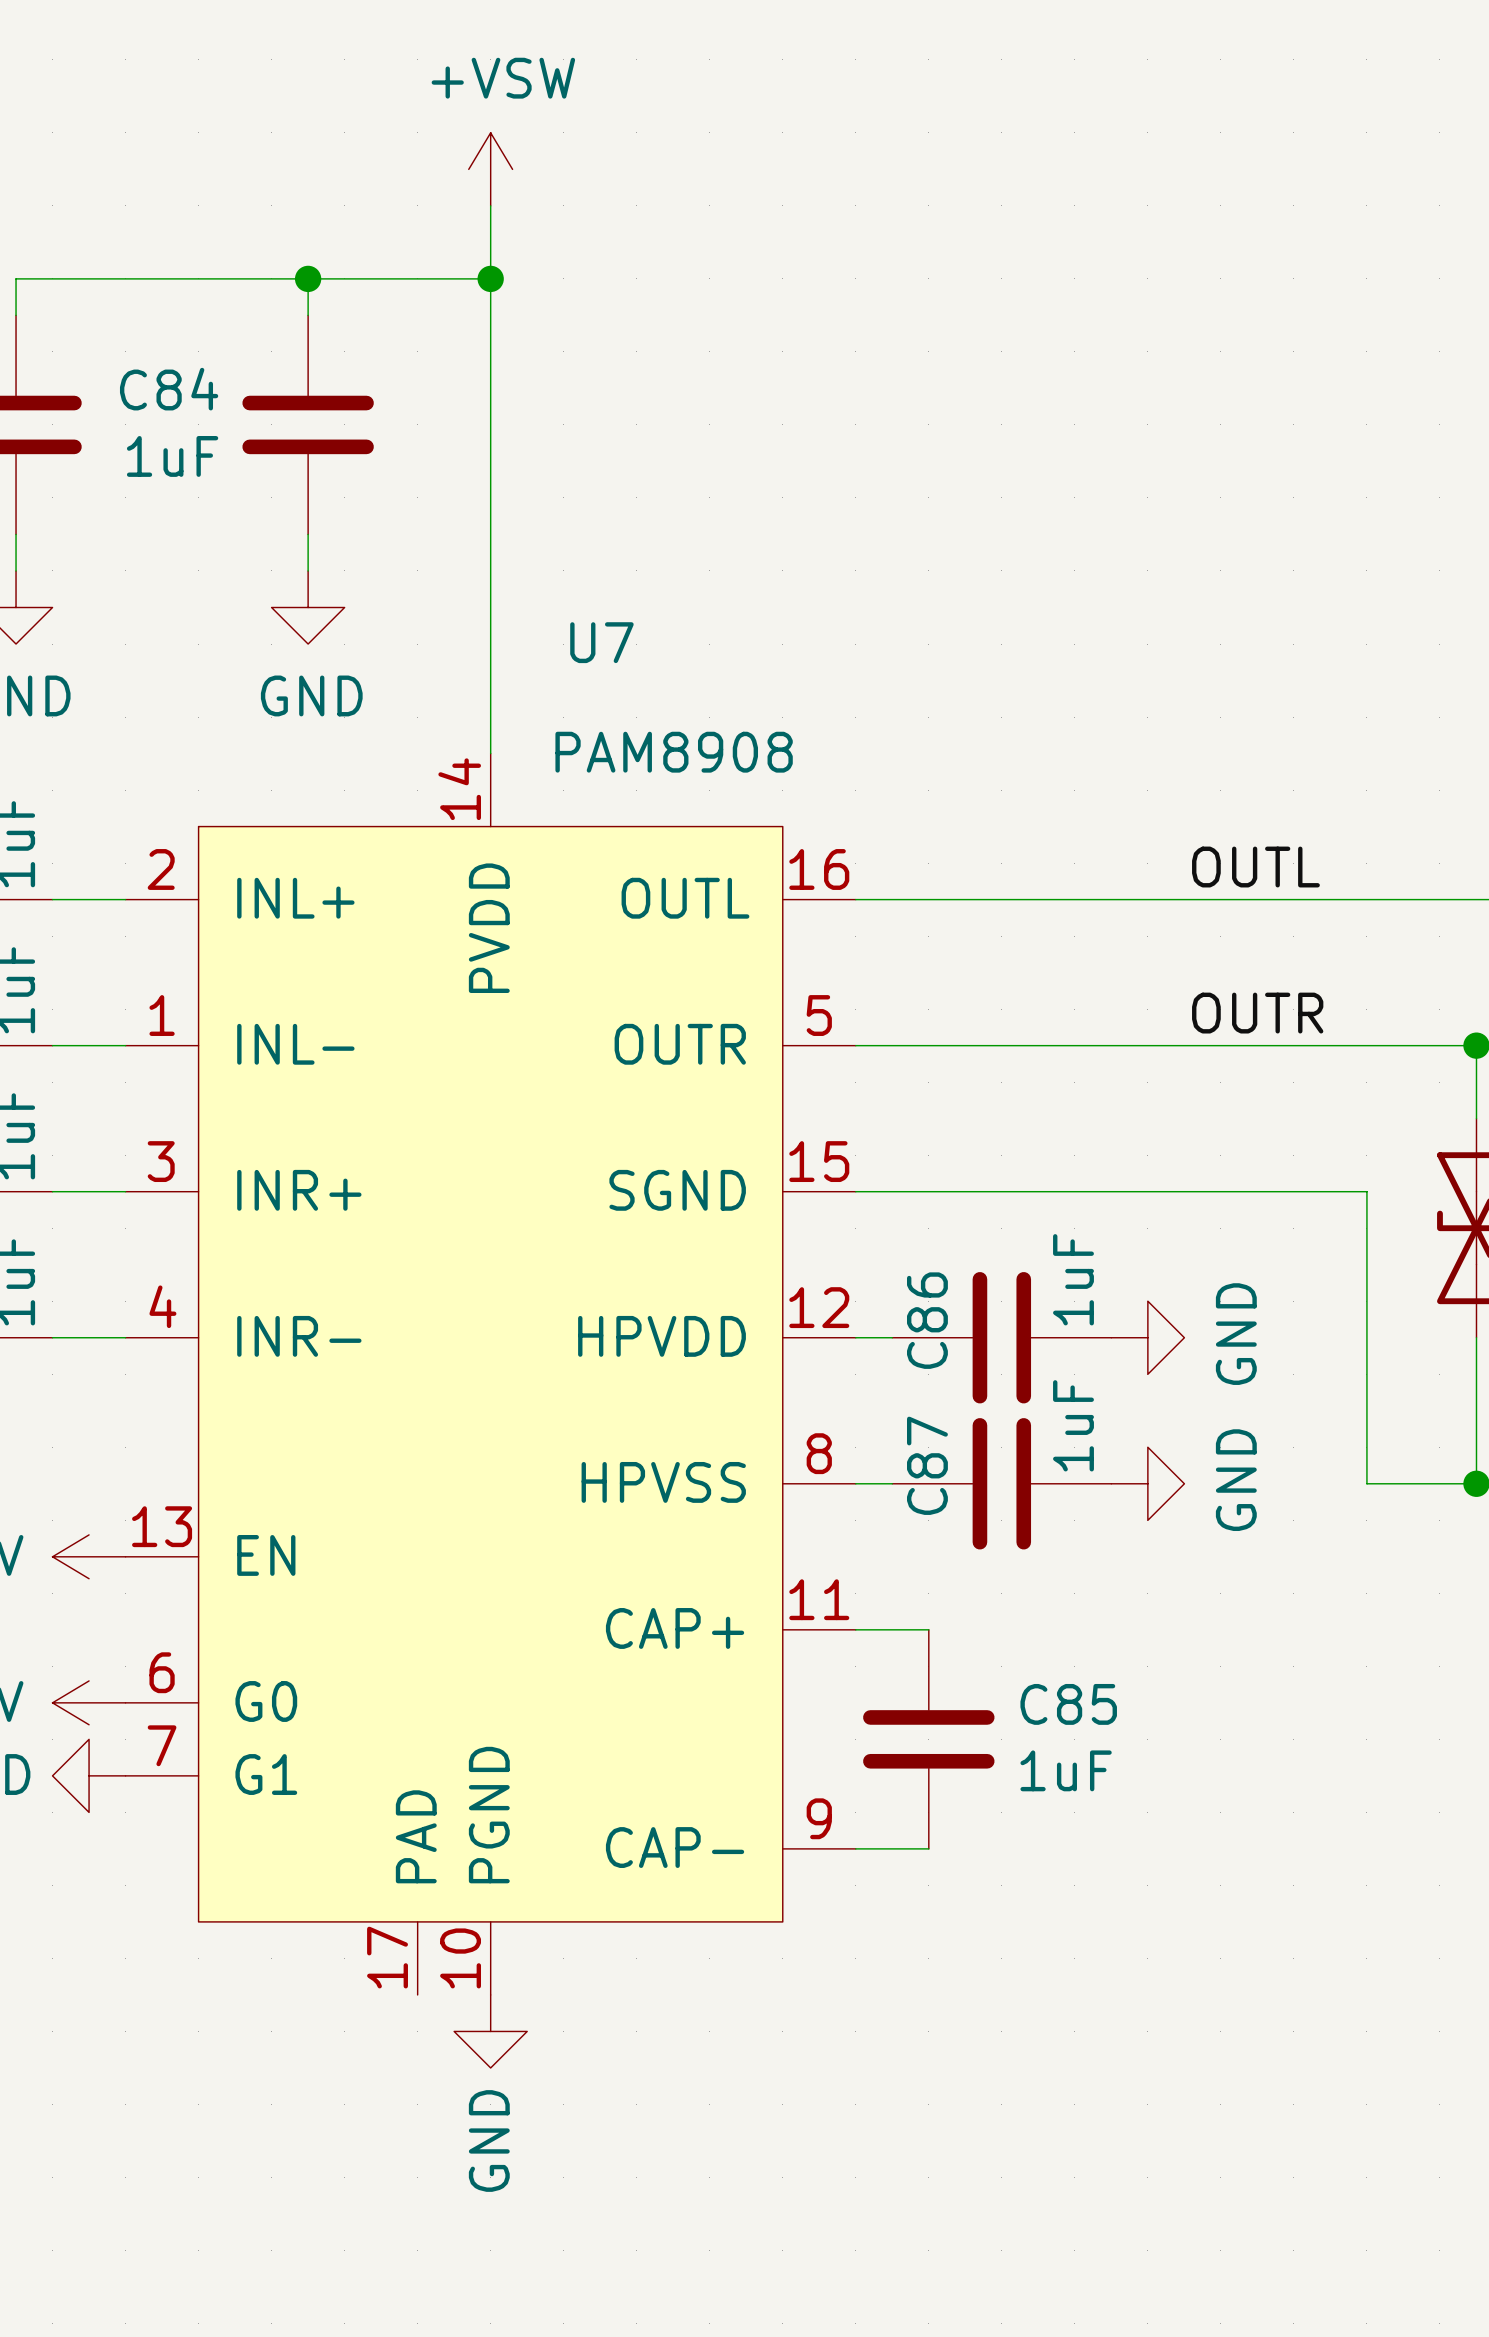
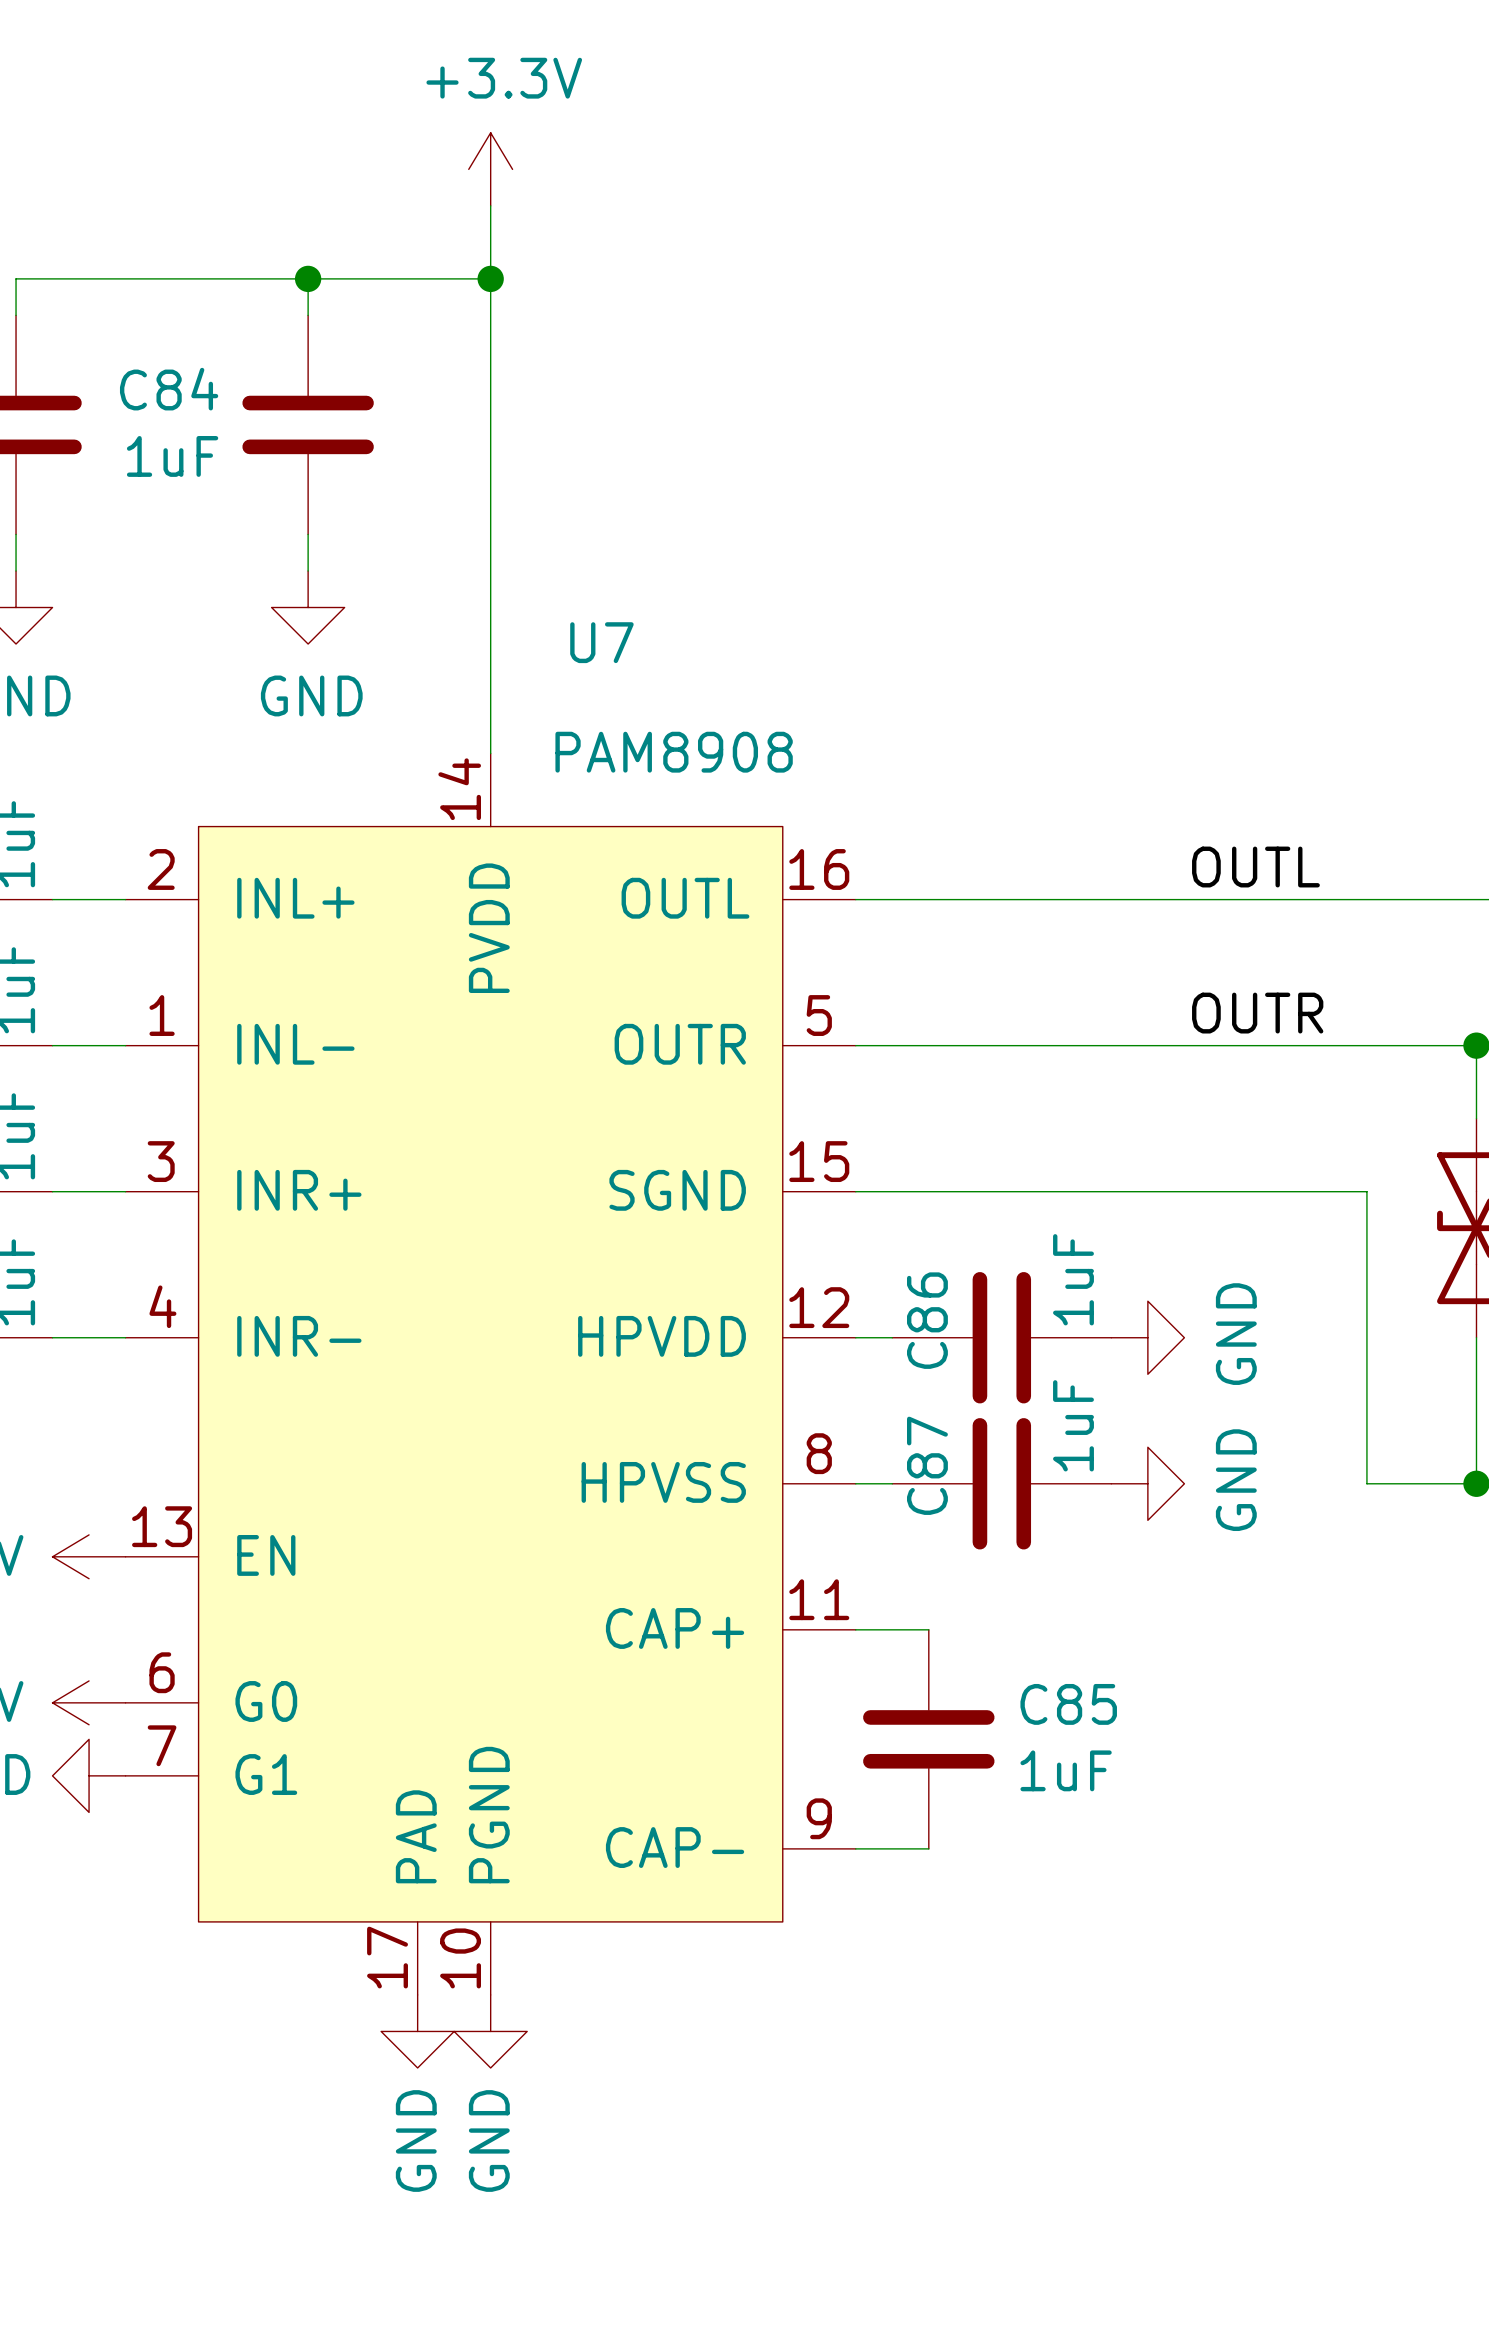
power symbol: +VSW (490, 169) -> +3.3V (490, 169)
power symbol: none -> GND (417, 2031)

